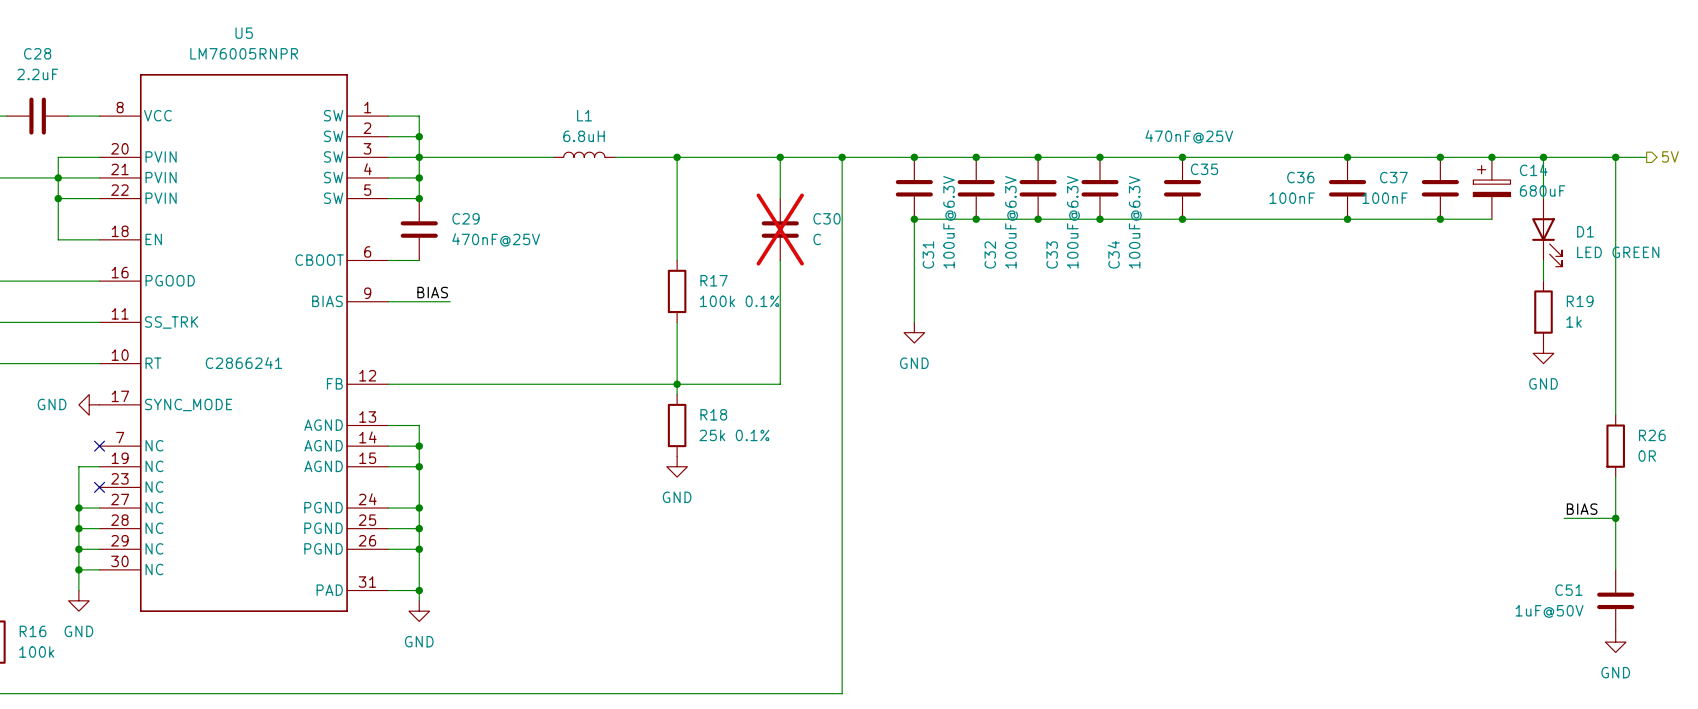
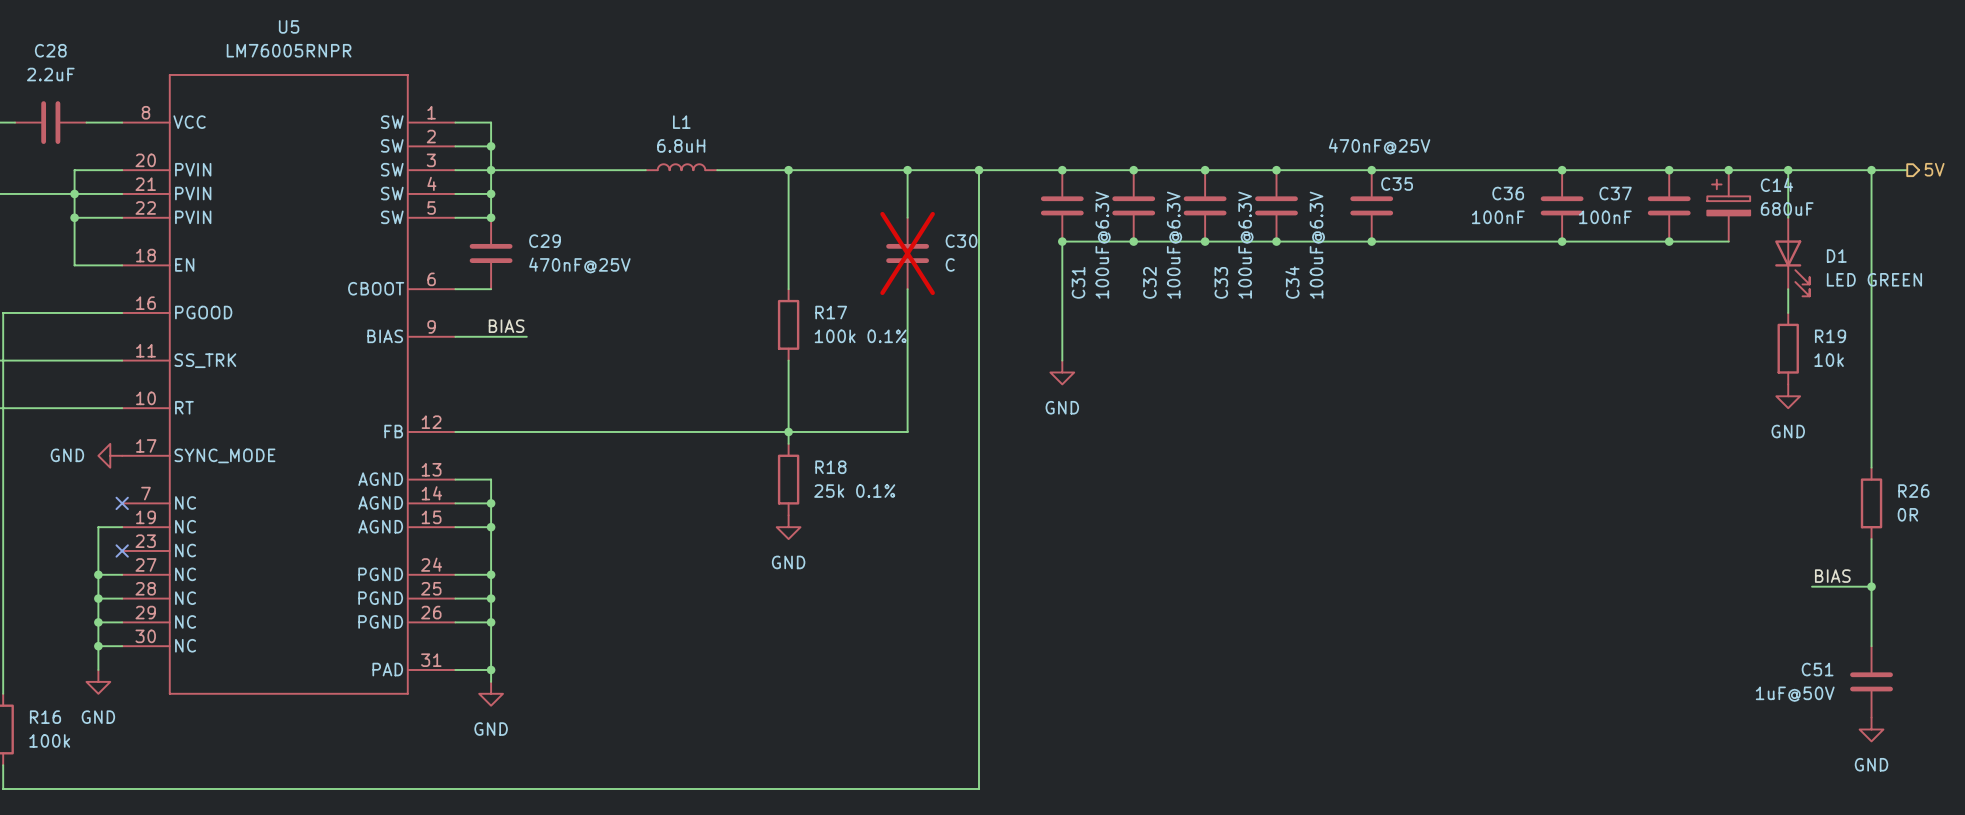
R19 value: 1k (1574, 321) -> 10k (1829, 360)
U5 text: C2866241 (243, 362) -> none

